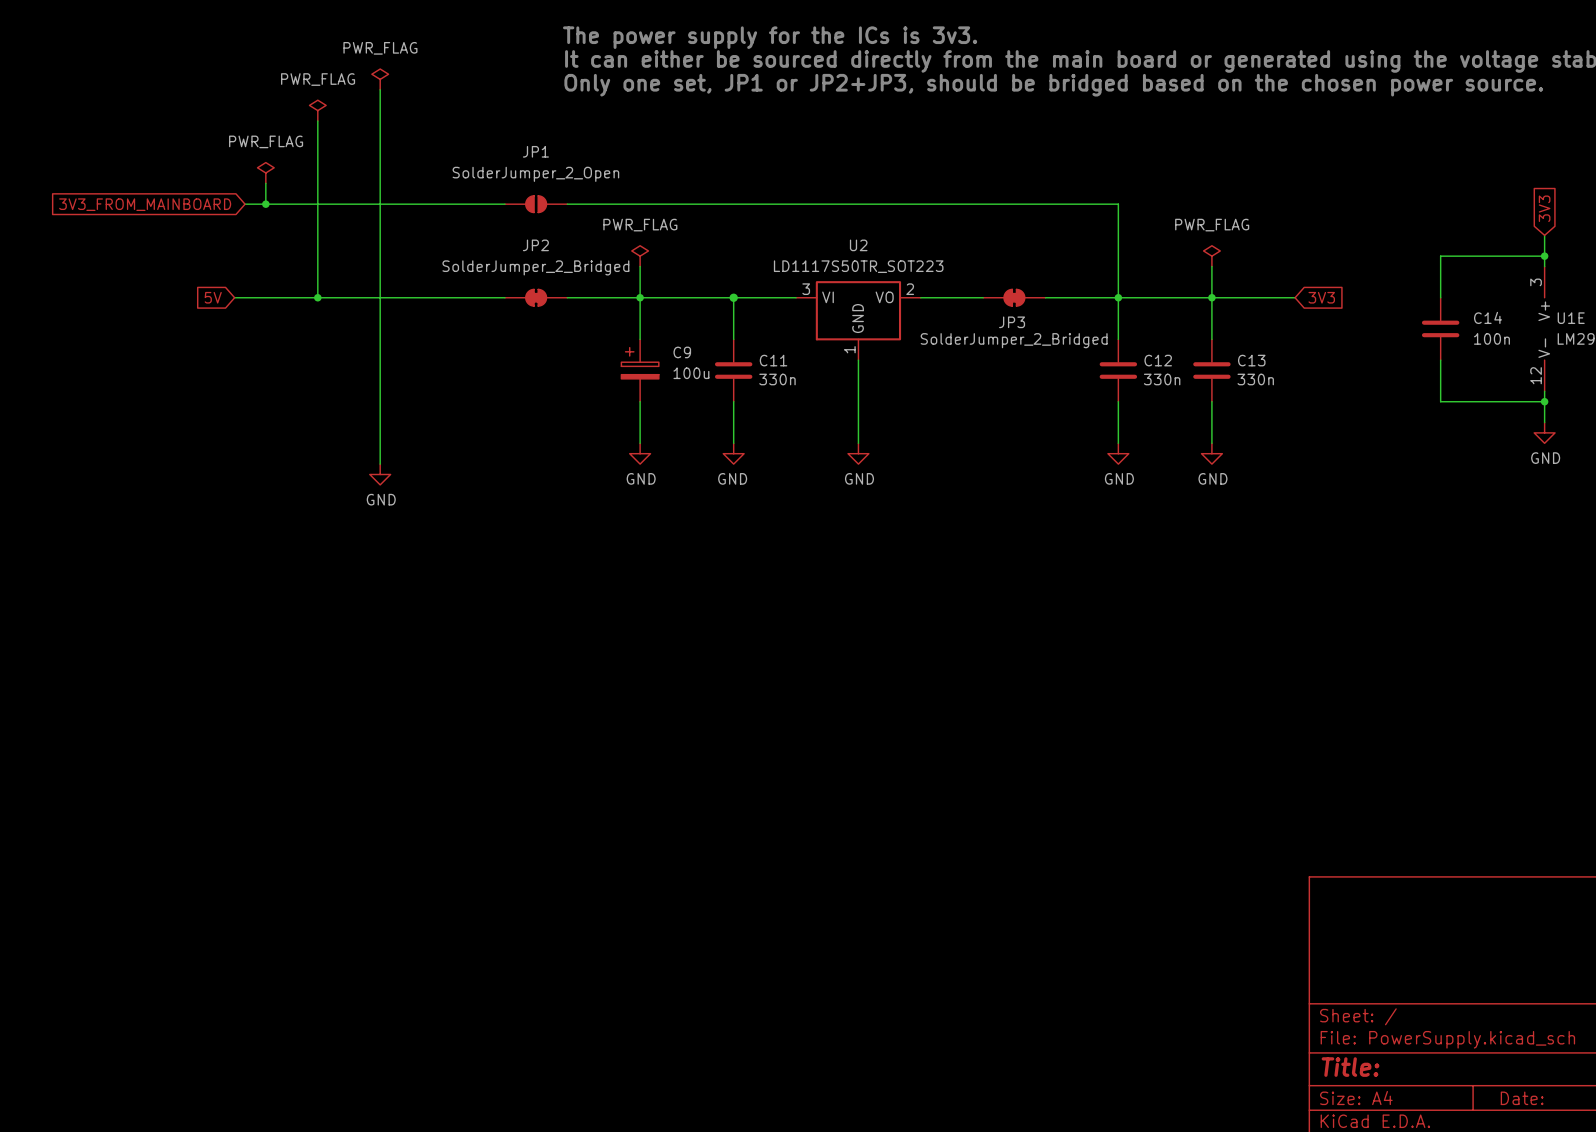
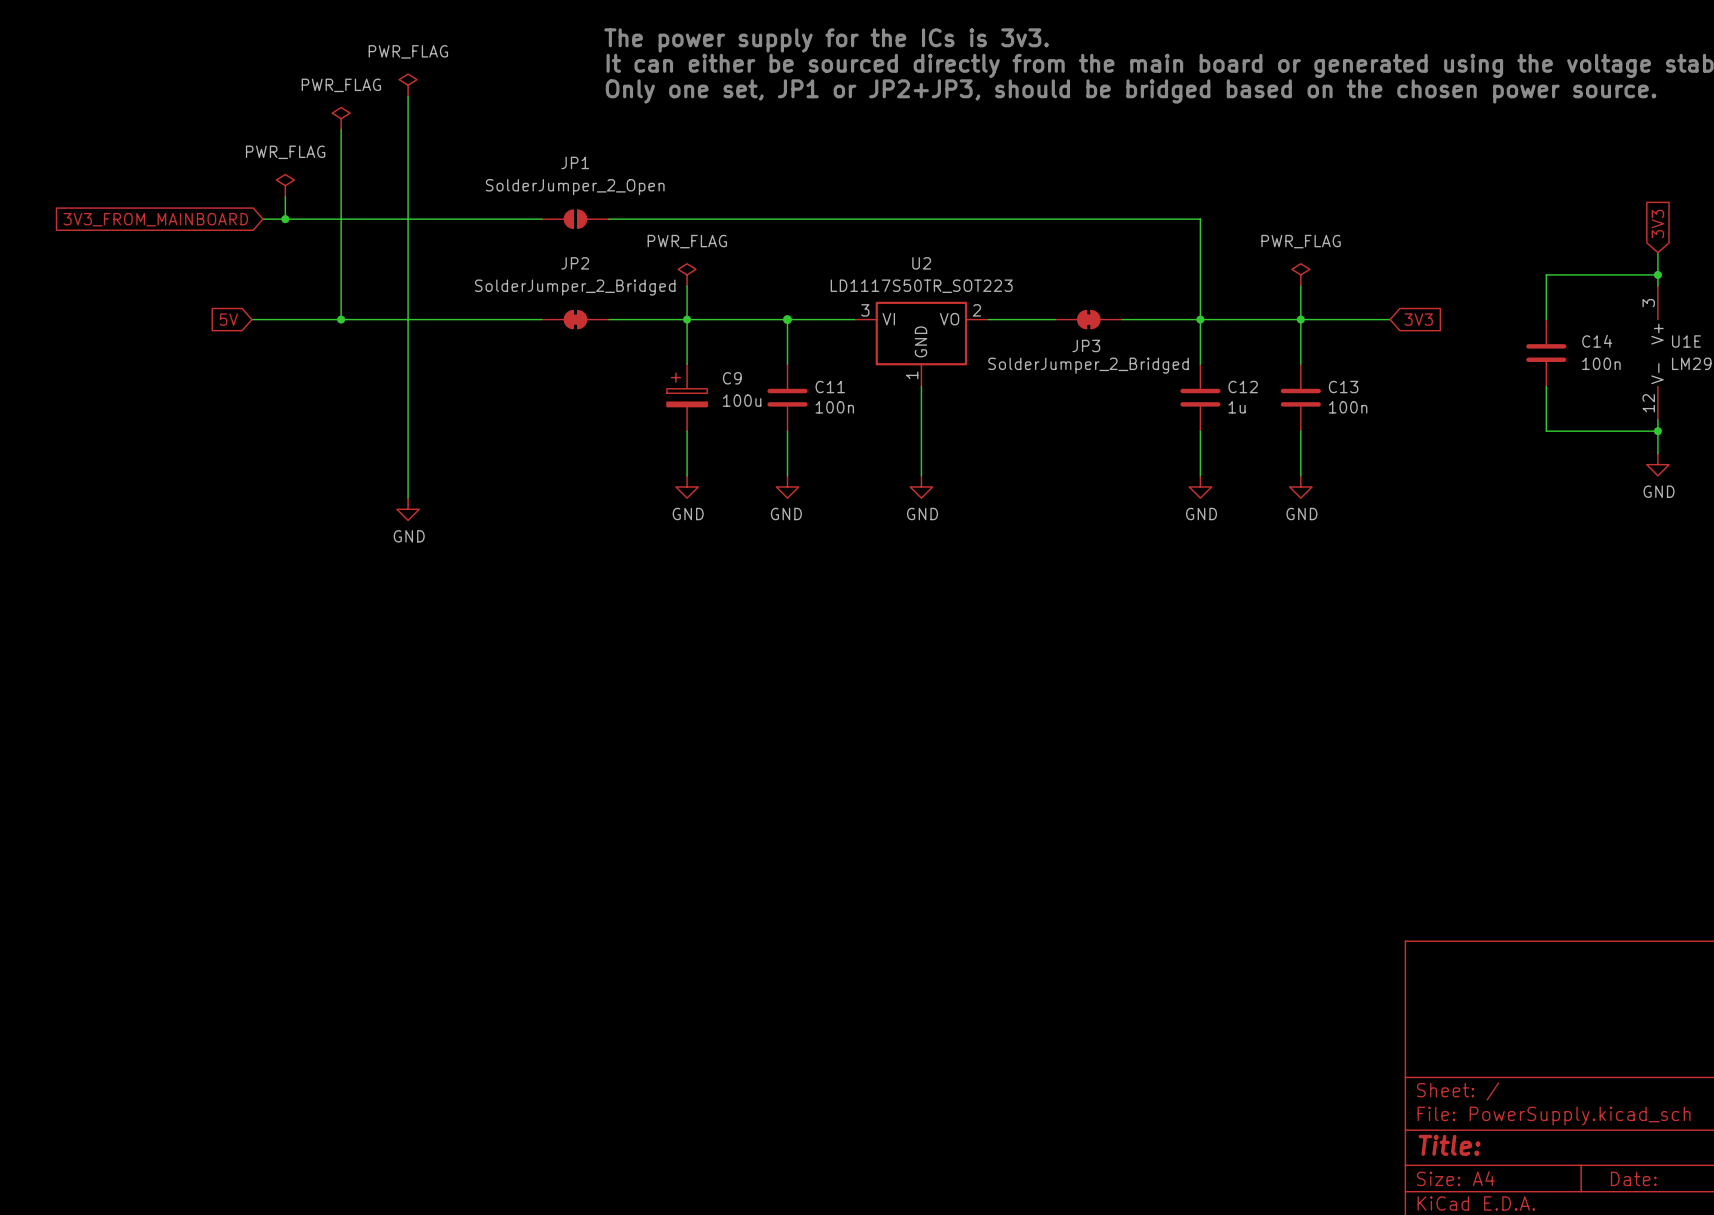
C11 value: 330n (777, 379) -> 100n (834, 407)
C12 value: 330n (1162, 379) -> 1u (1237, 407)
C13 value: 330n (1255, 379) -> 100n (1348, 407)

